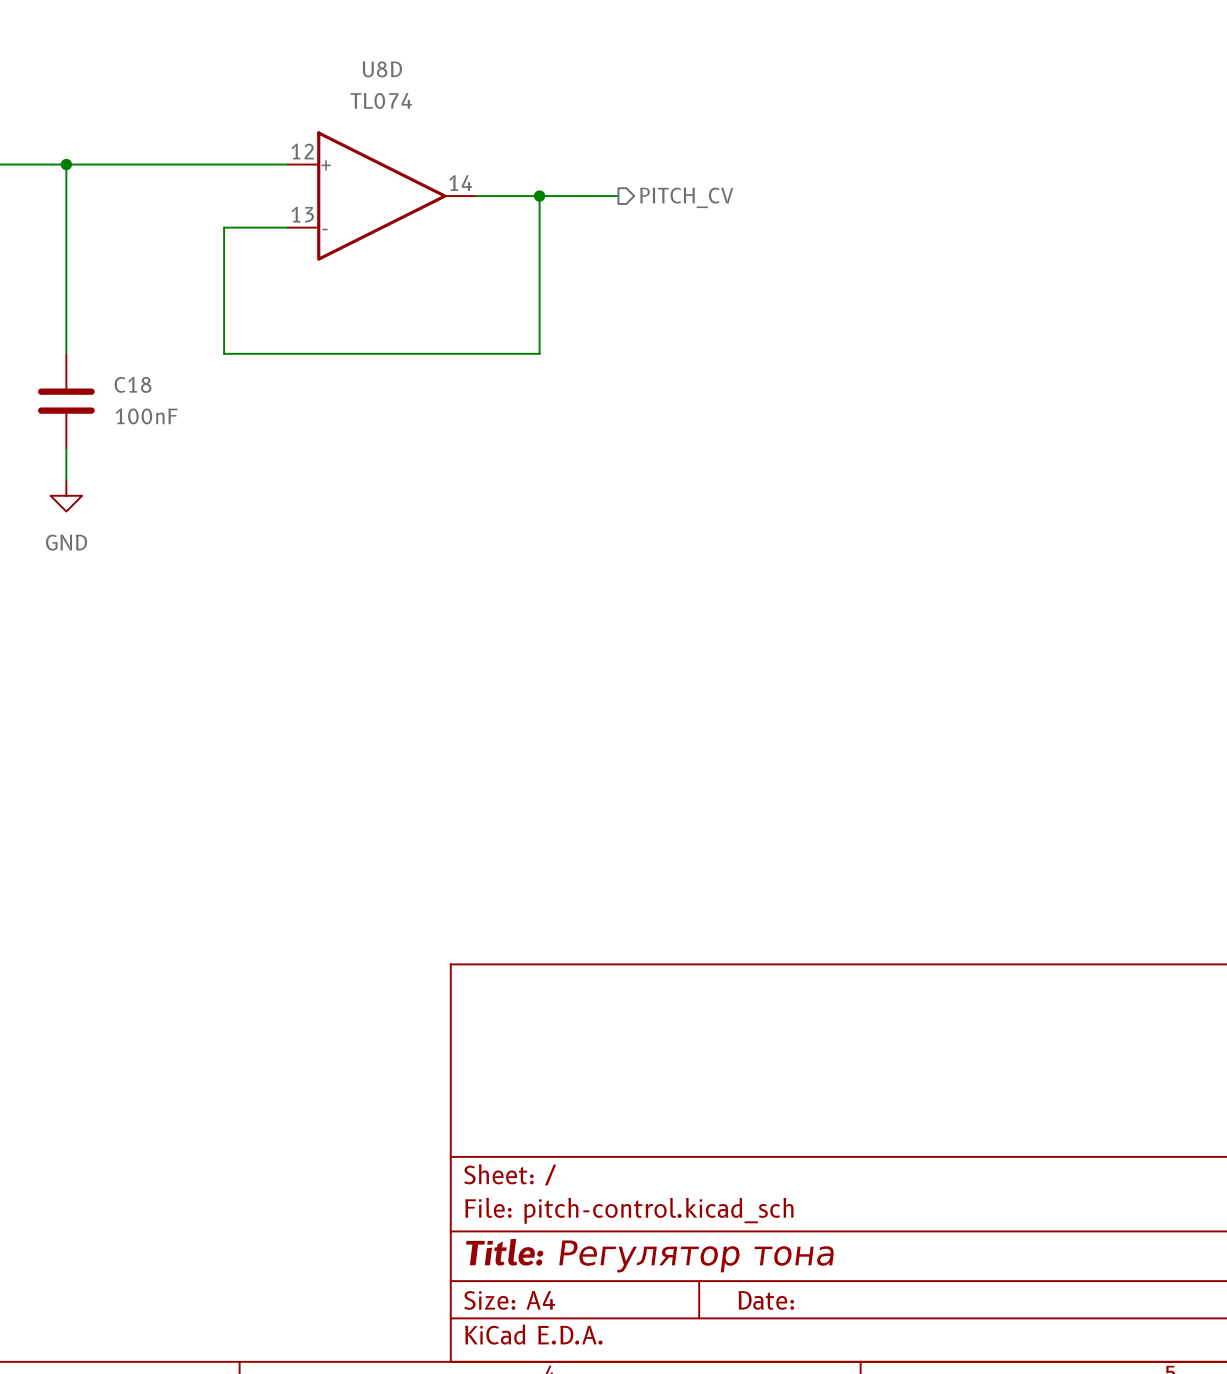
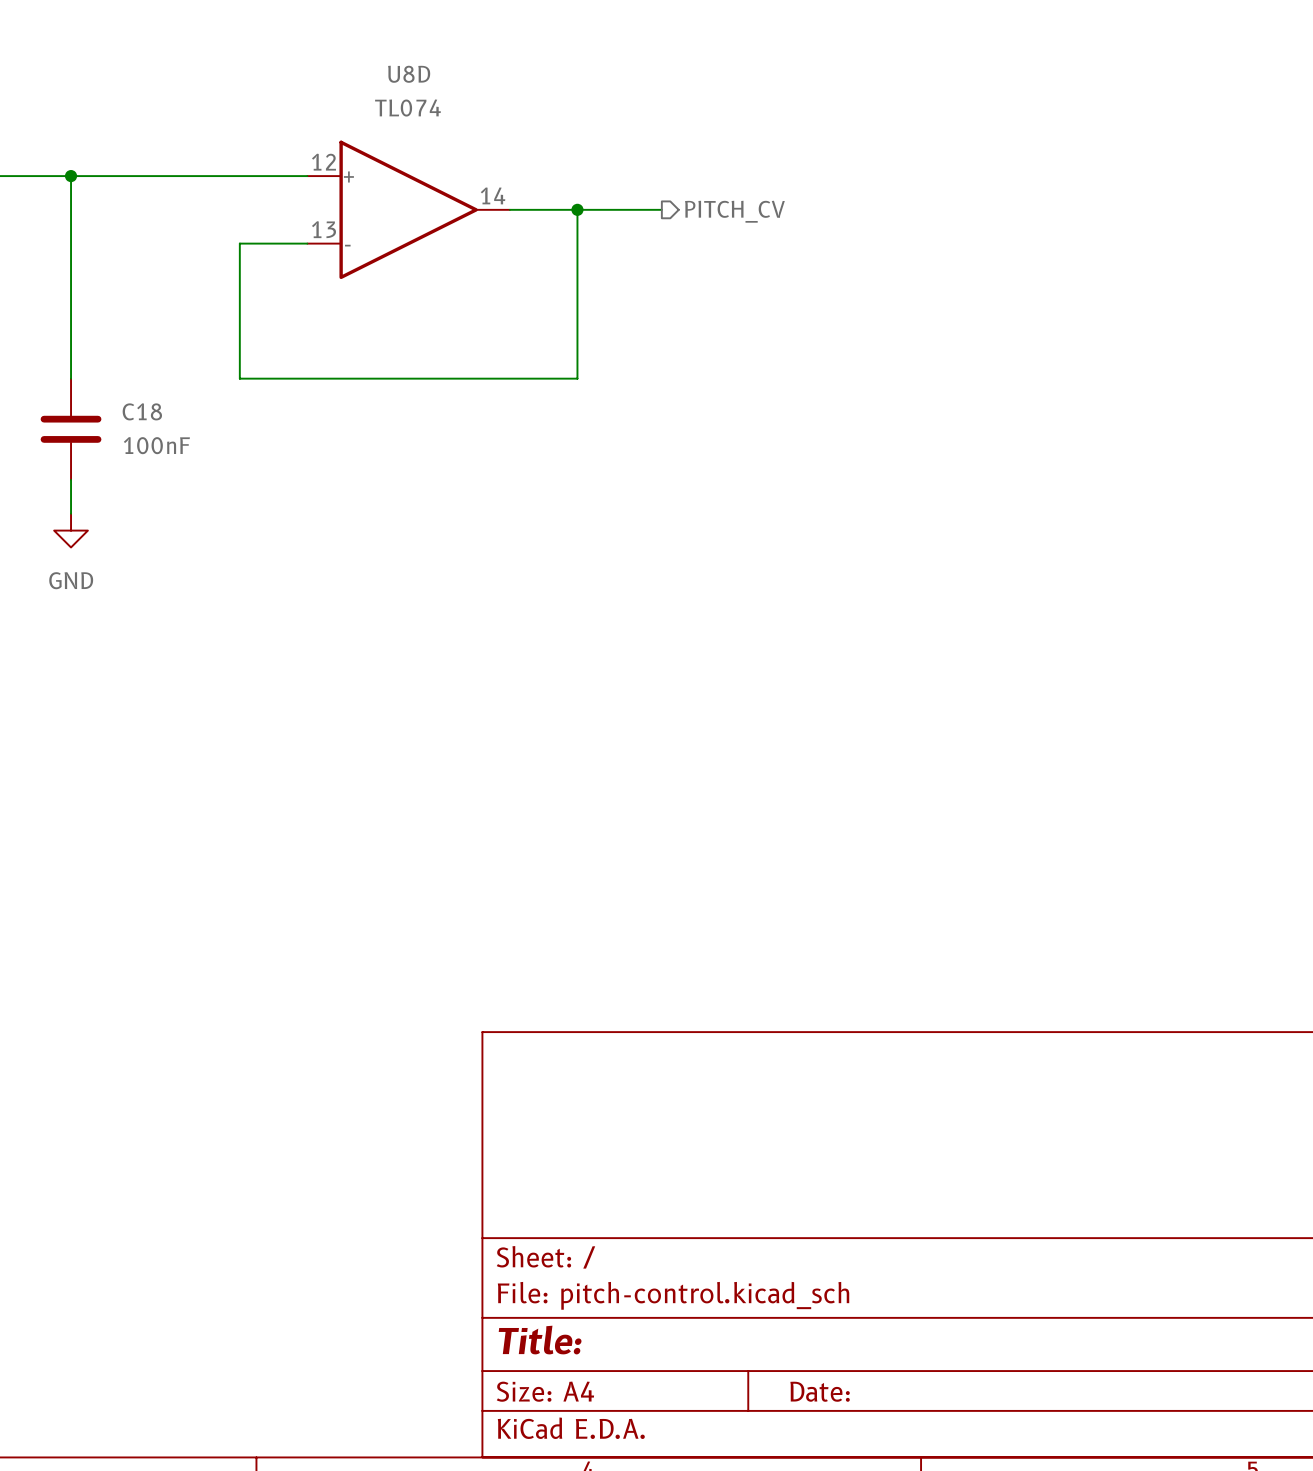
title block: Title: Регулятор тона (650, 1255) -> Title: (540, 1340)

